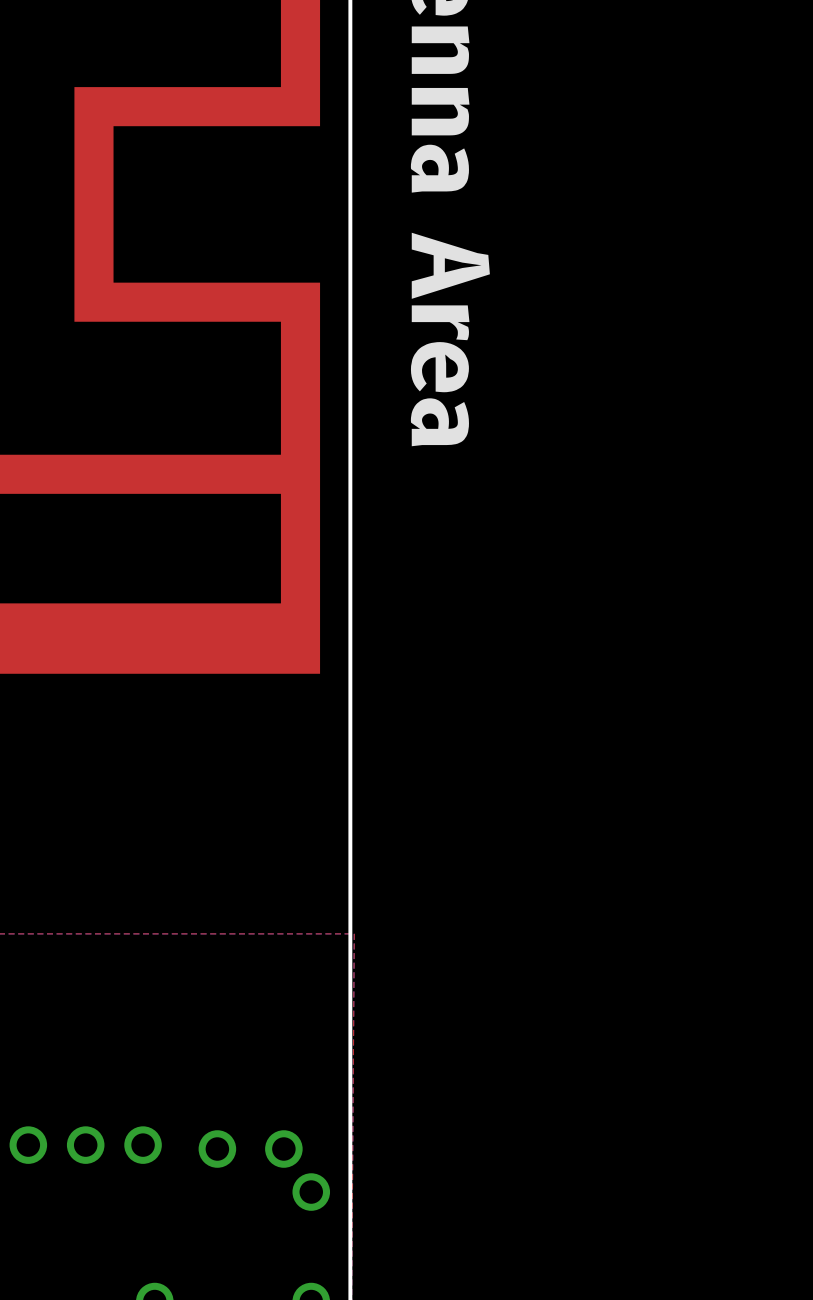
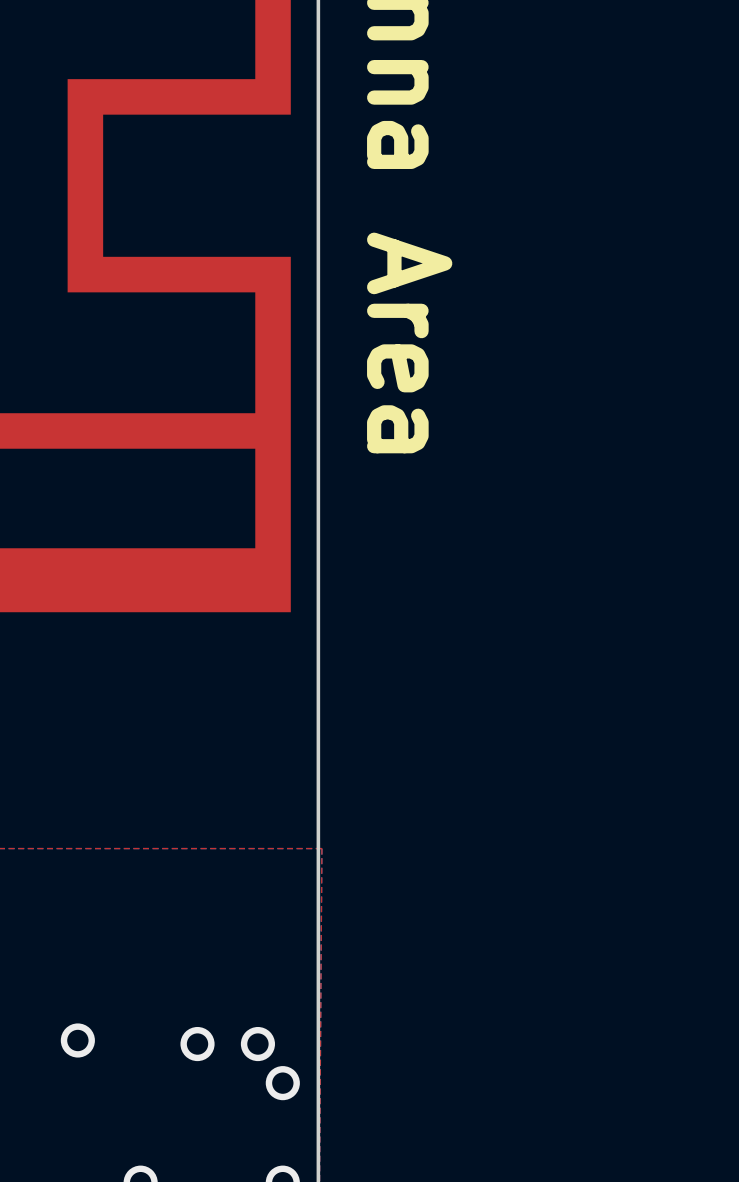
via: (28, 1145) -> none
via: (143, 1145) -> none

